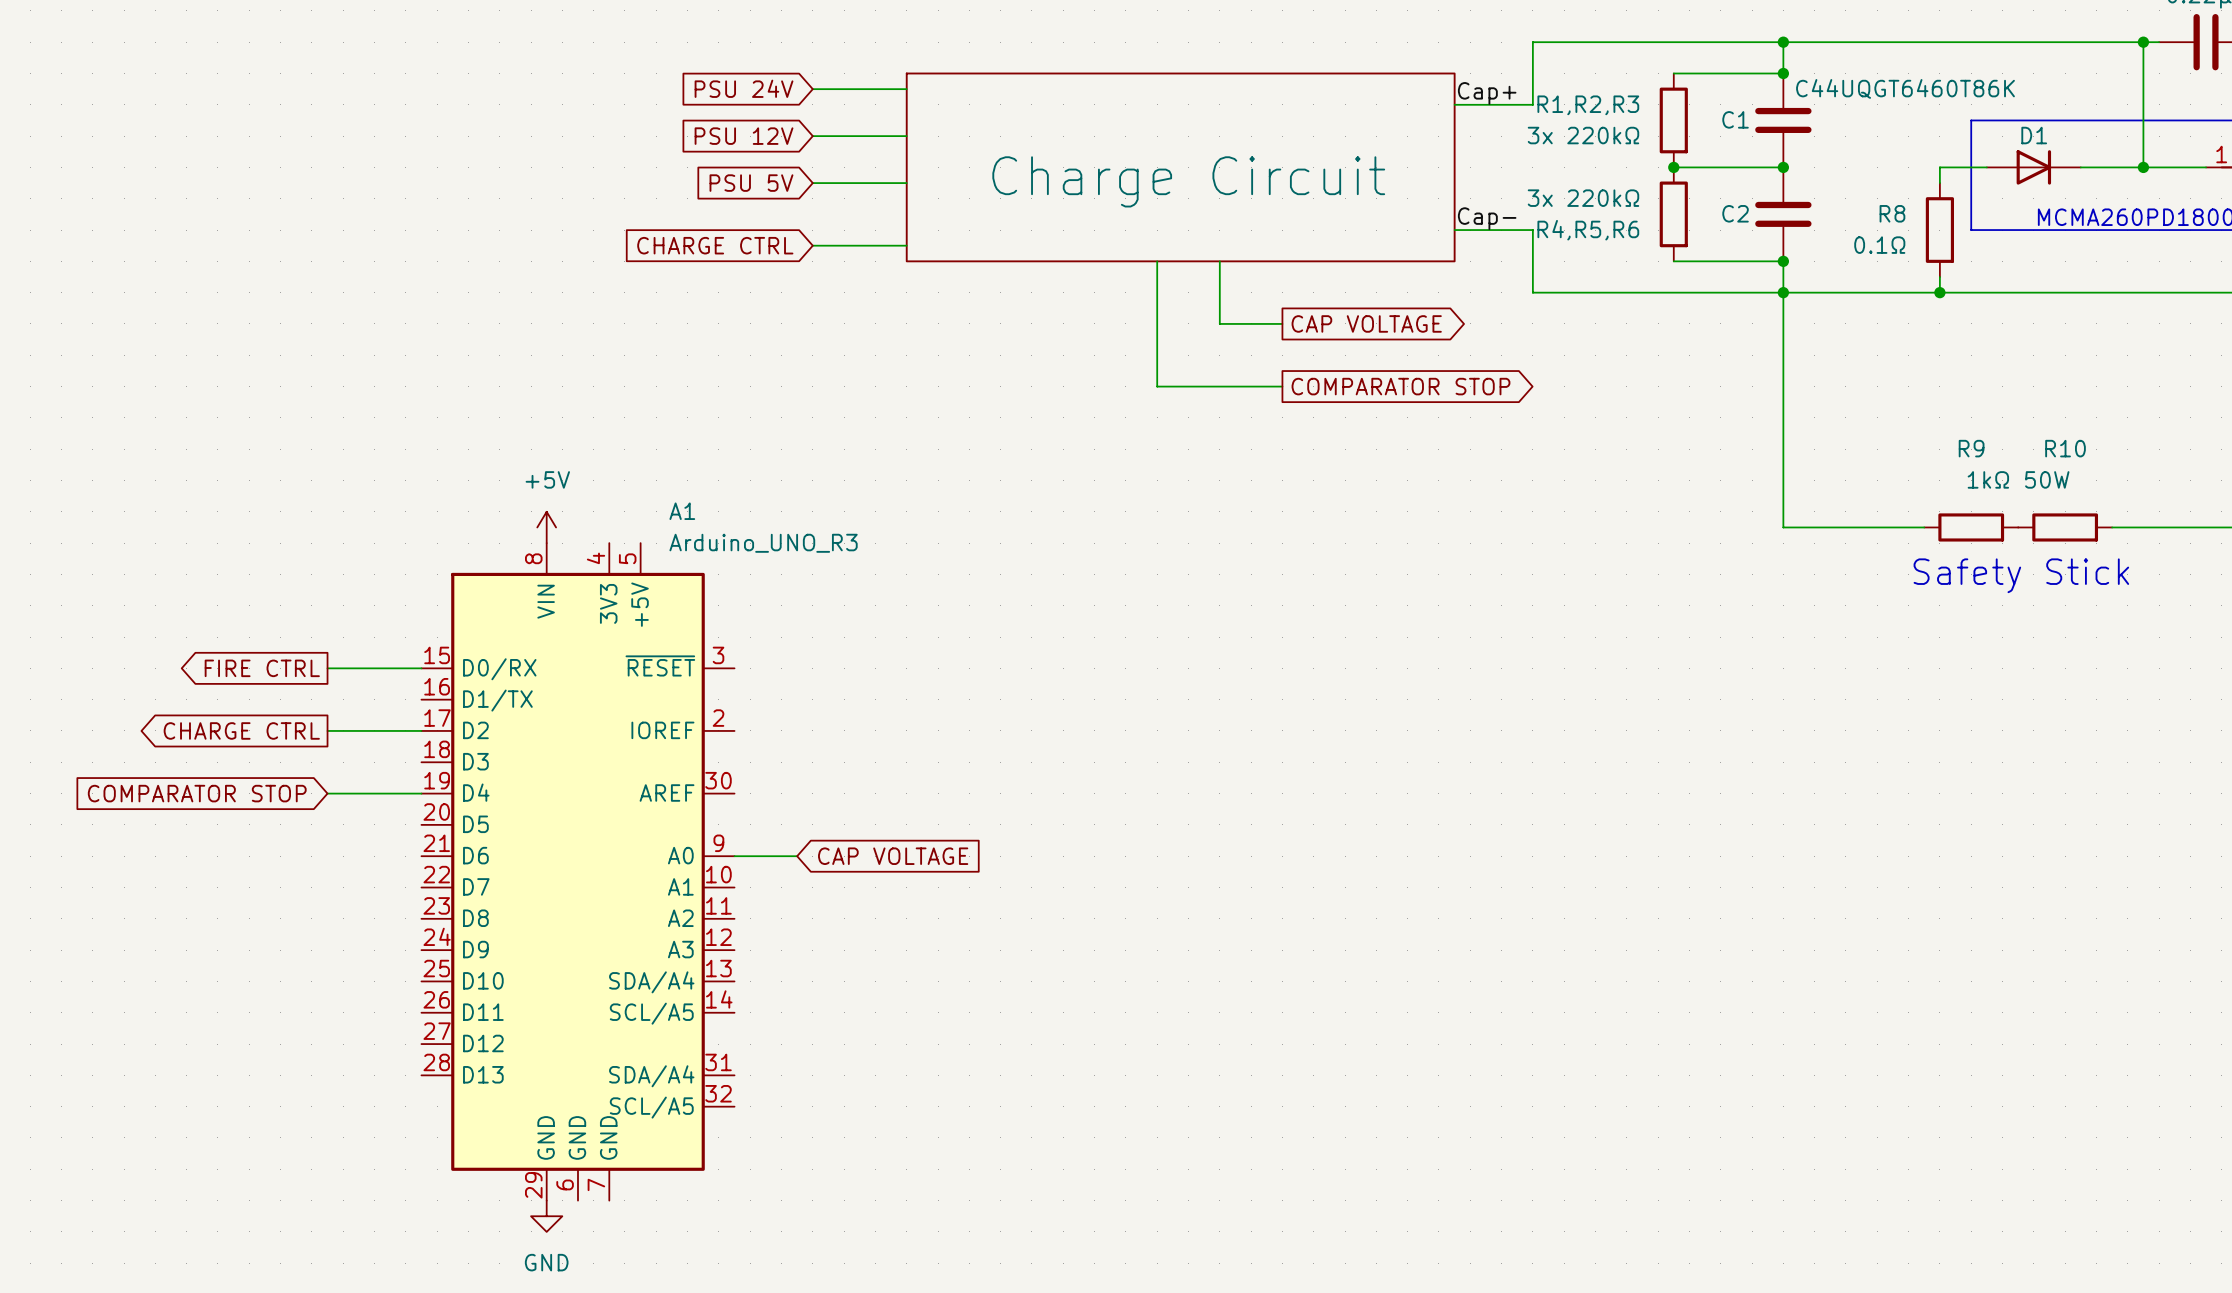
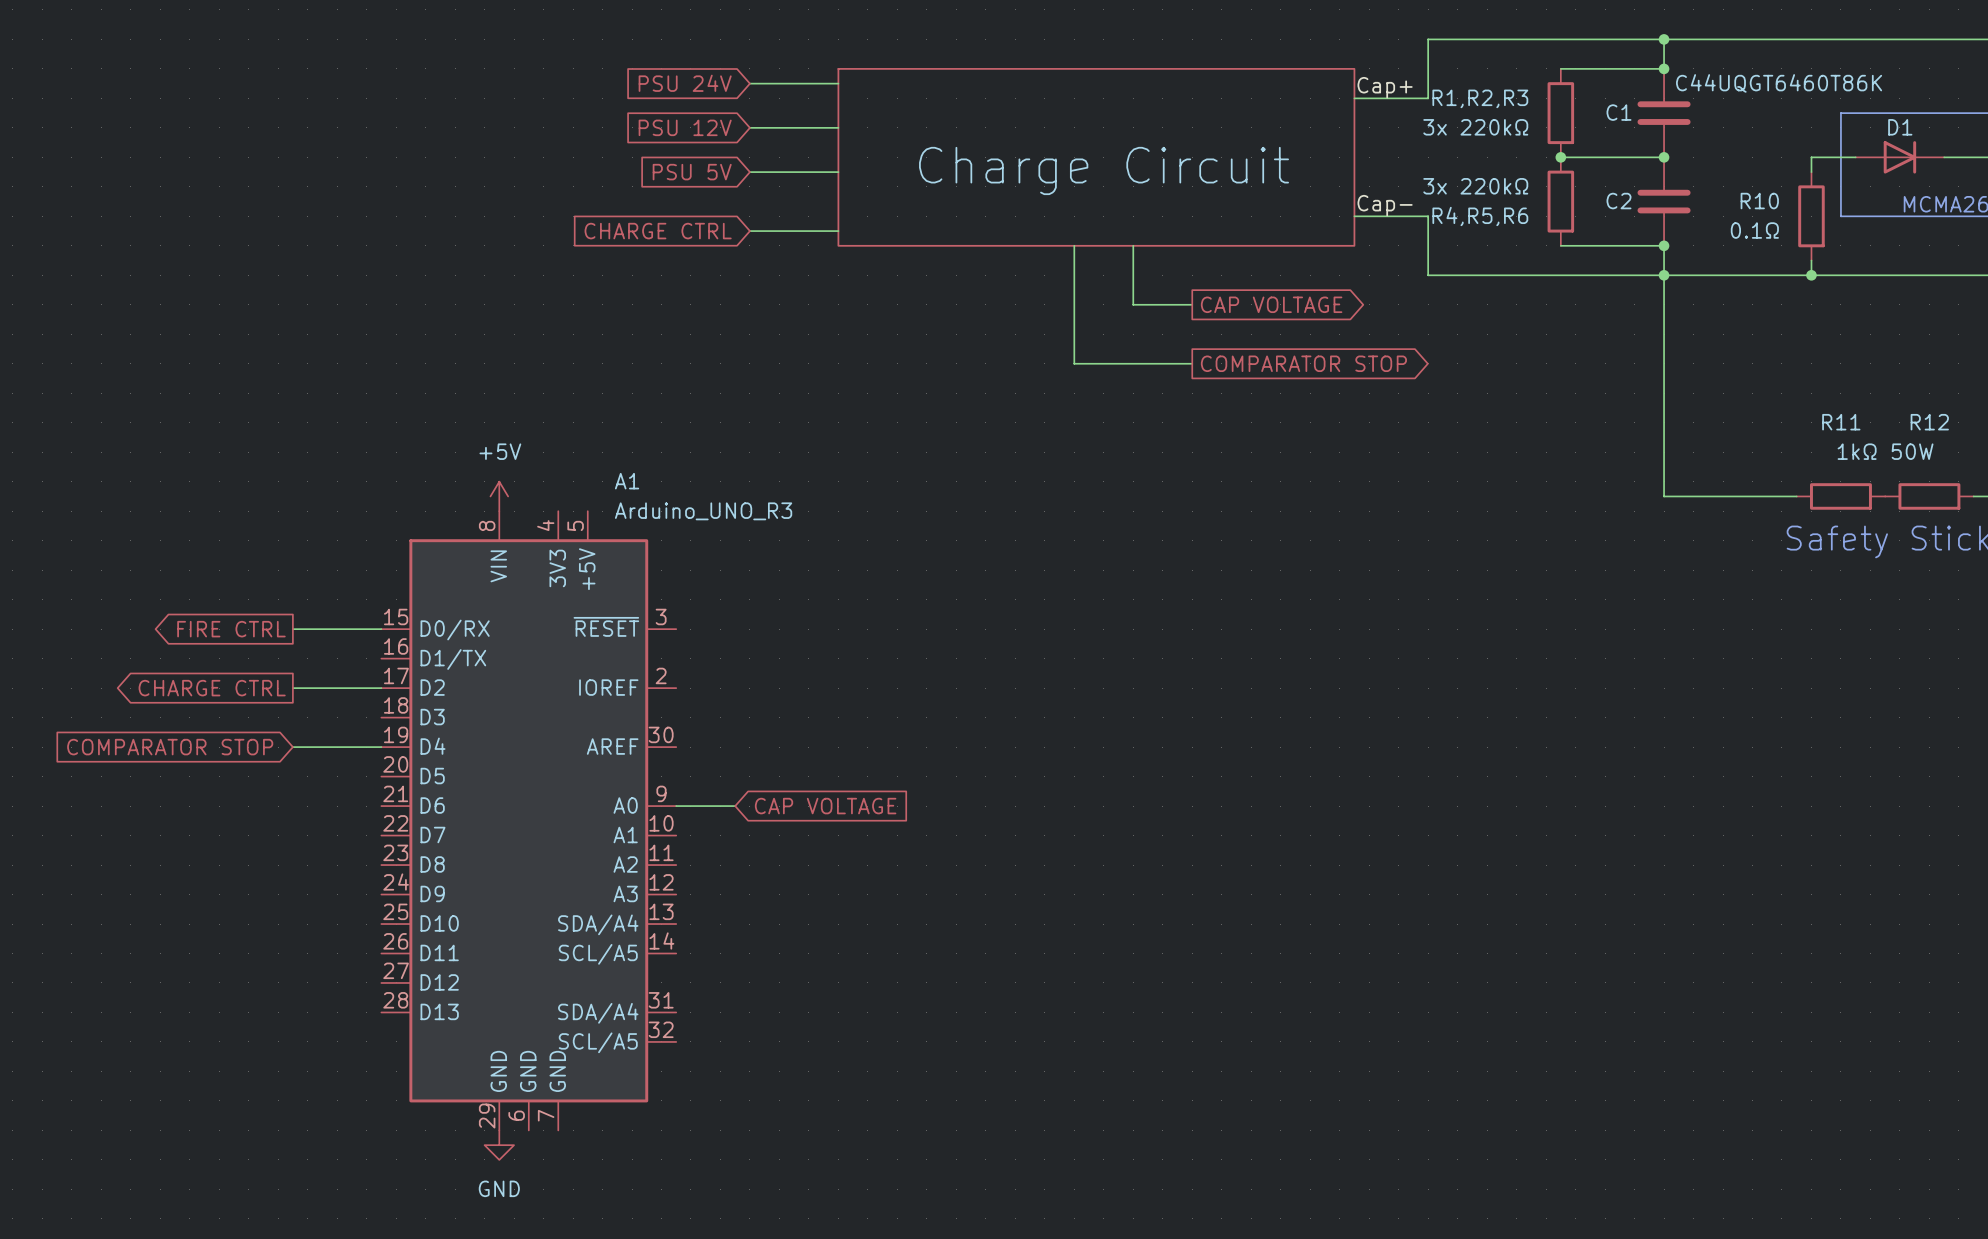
R8 name: R8 (1892, 213) -> R10 (1759, 201)
R9 name: R9 (1971, 448) -> R11 (1841, 422)
R10 name: R10 (2065, 448) -> R12 (1929, 422)

